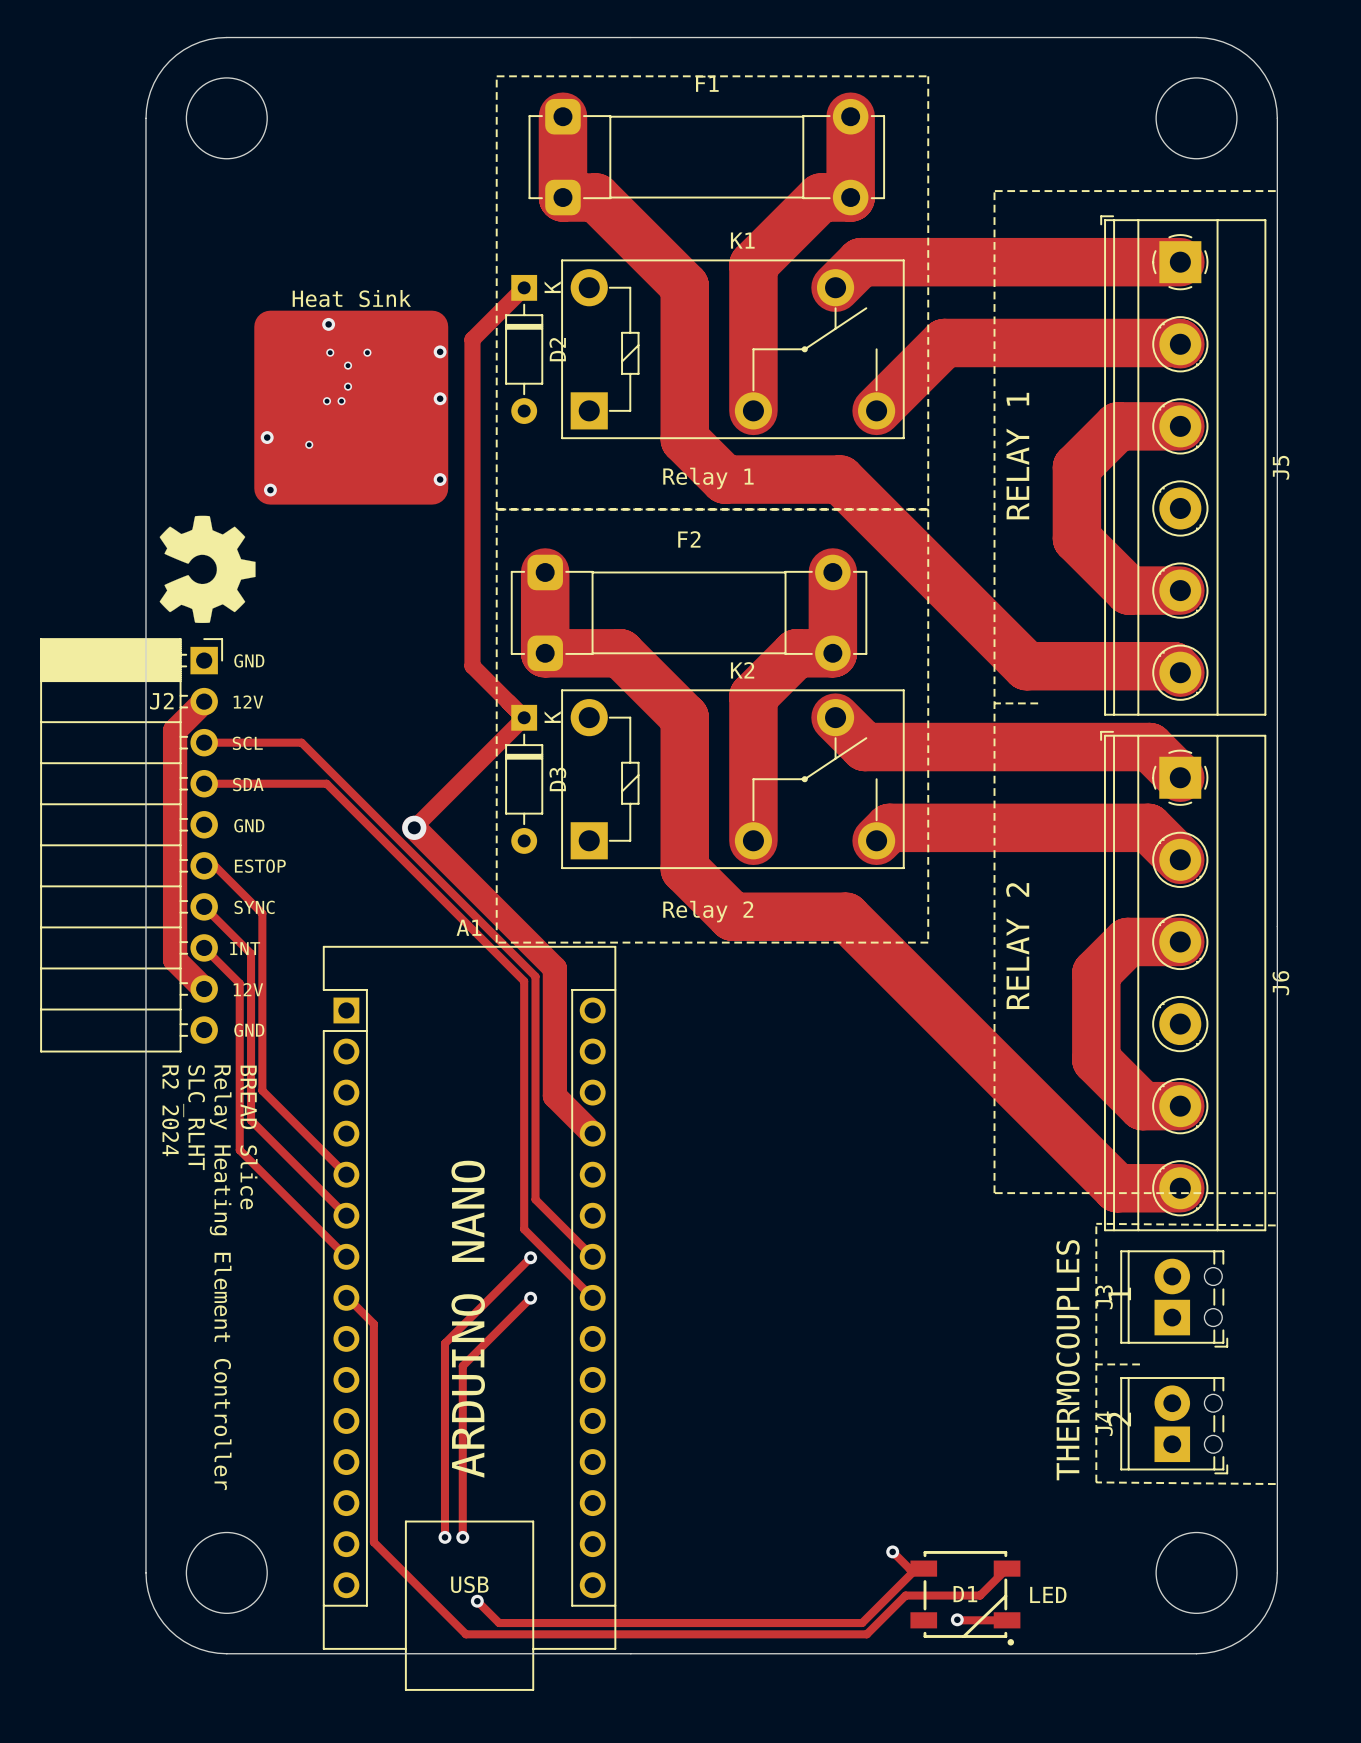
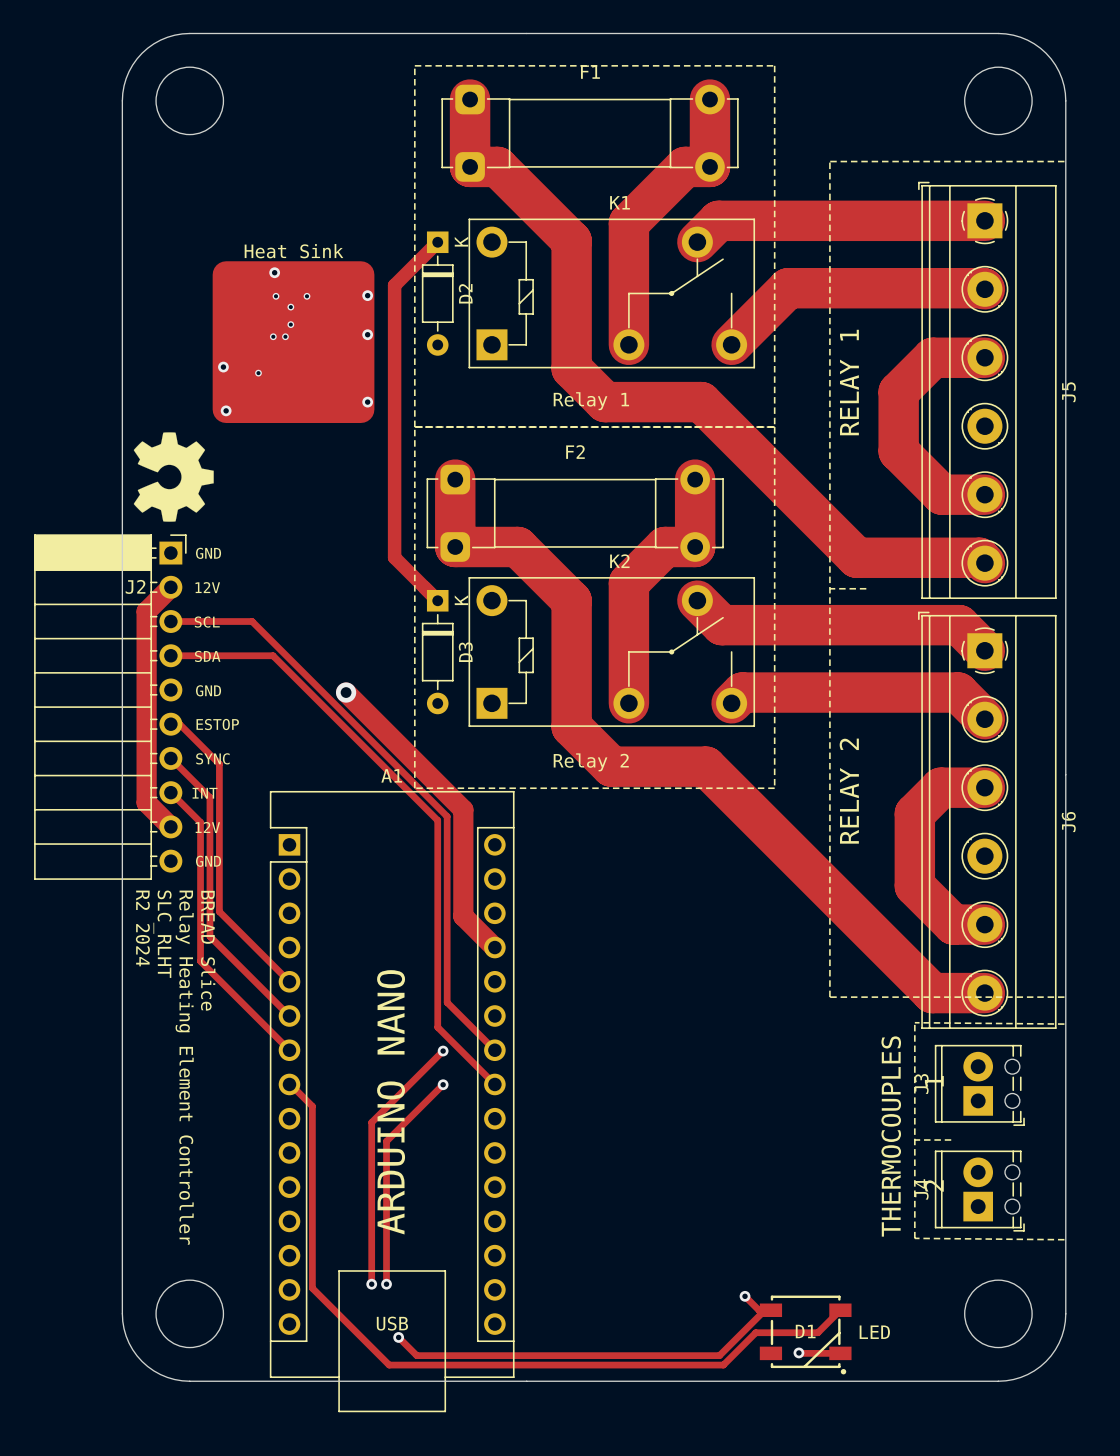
track: (524, 717) (414, 827) -> none

